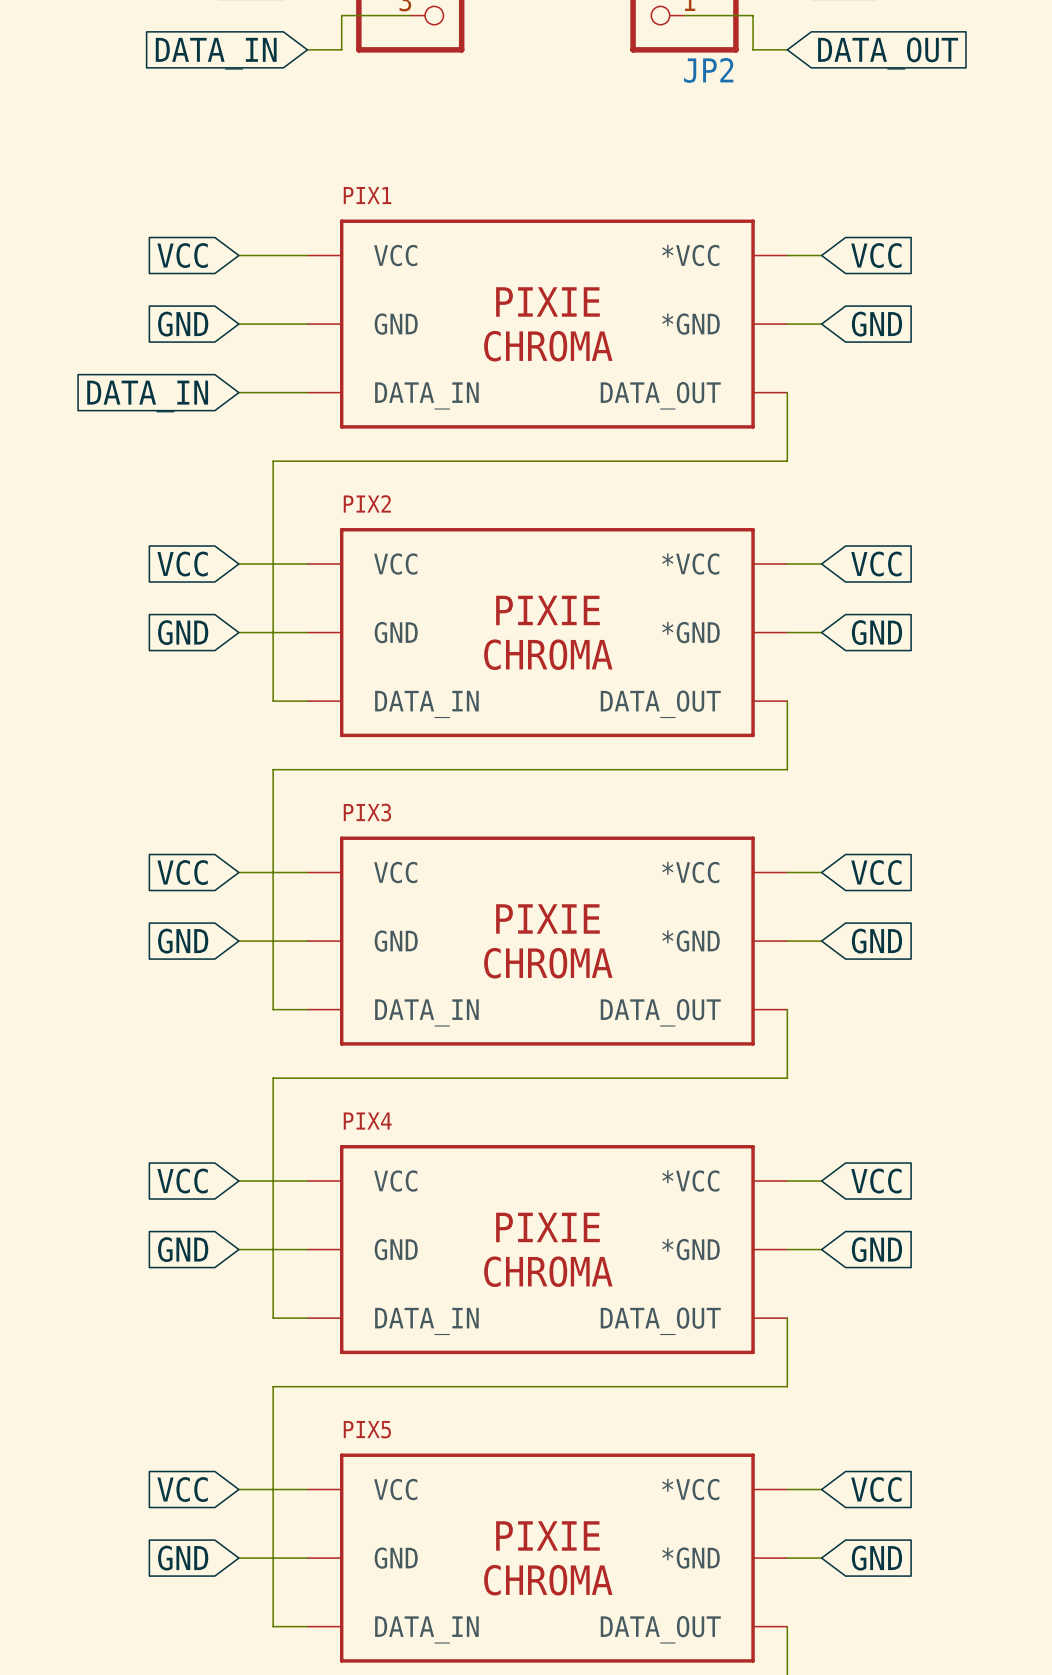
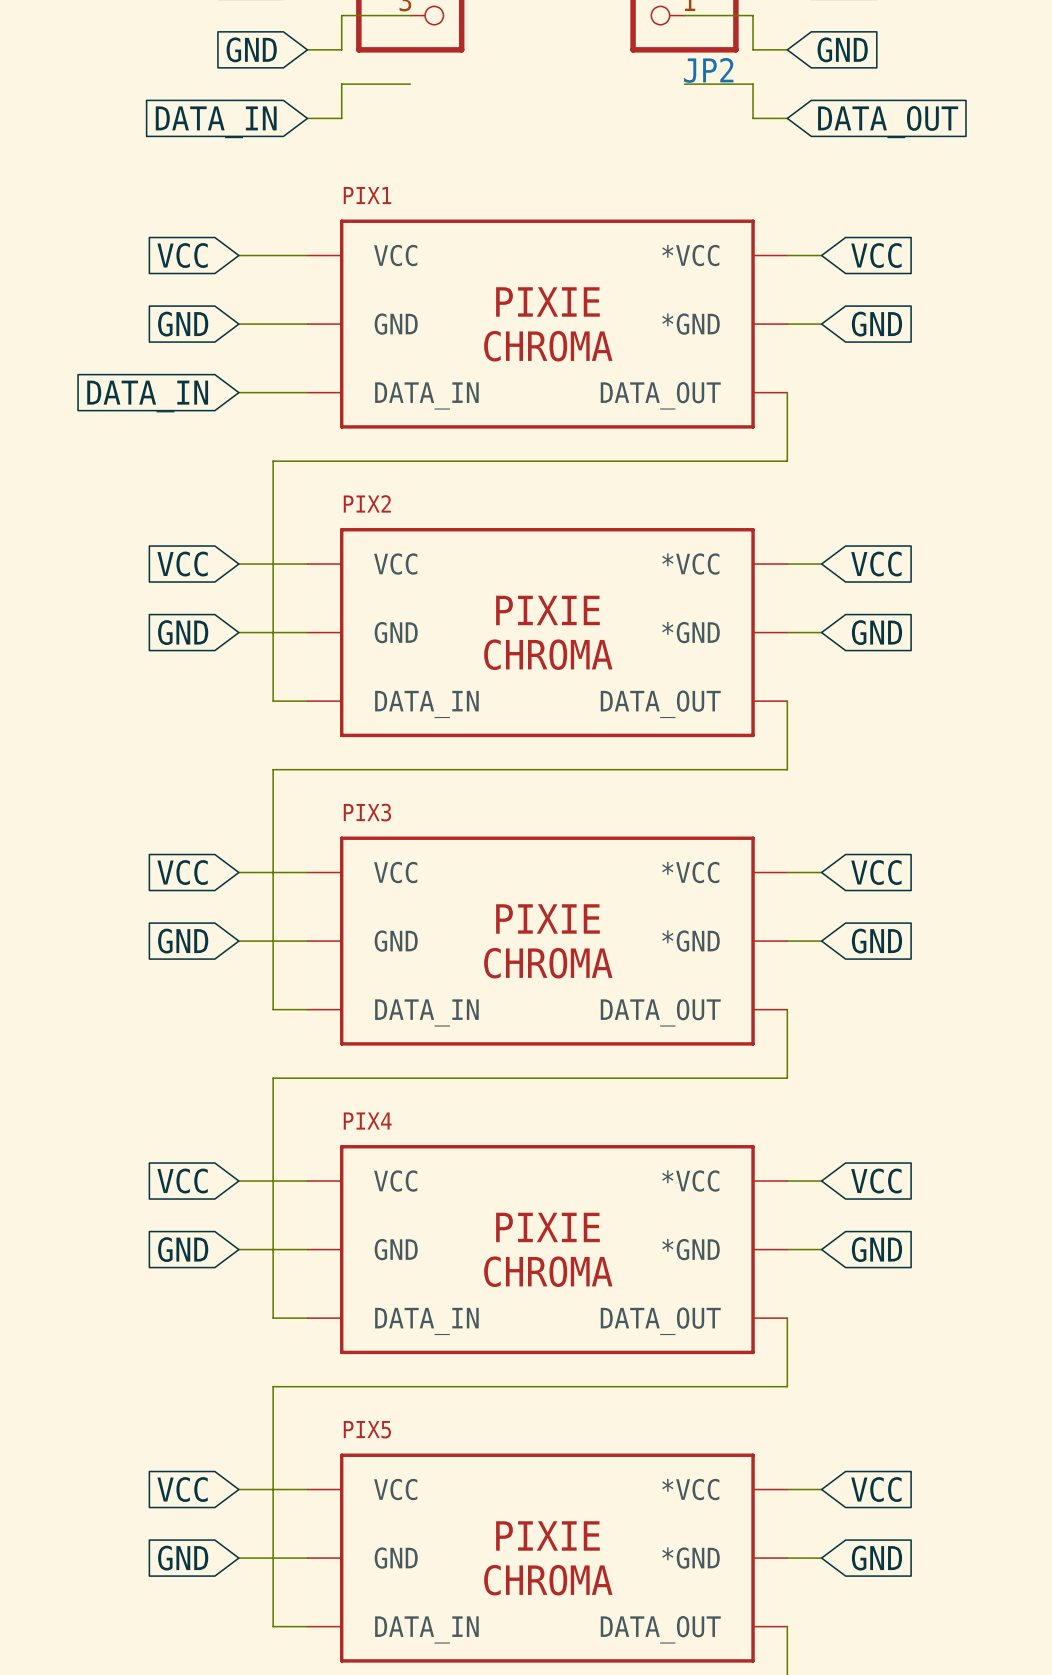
global label: DATA_IN (216, 53) -> GND (251, 49)
global label: DATA_OUT (888, 53) -> GND (842, 49)
wire: none -> (410, 84) (341, 84) (341, 118) (307, 118)
wire: none -> (684, 84) (753, 84) (753, 118) (787, 118)
global label: none -> DATA_IN (216, 122)
global label: none -> DATA_OUT (888, 122)

